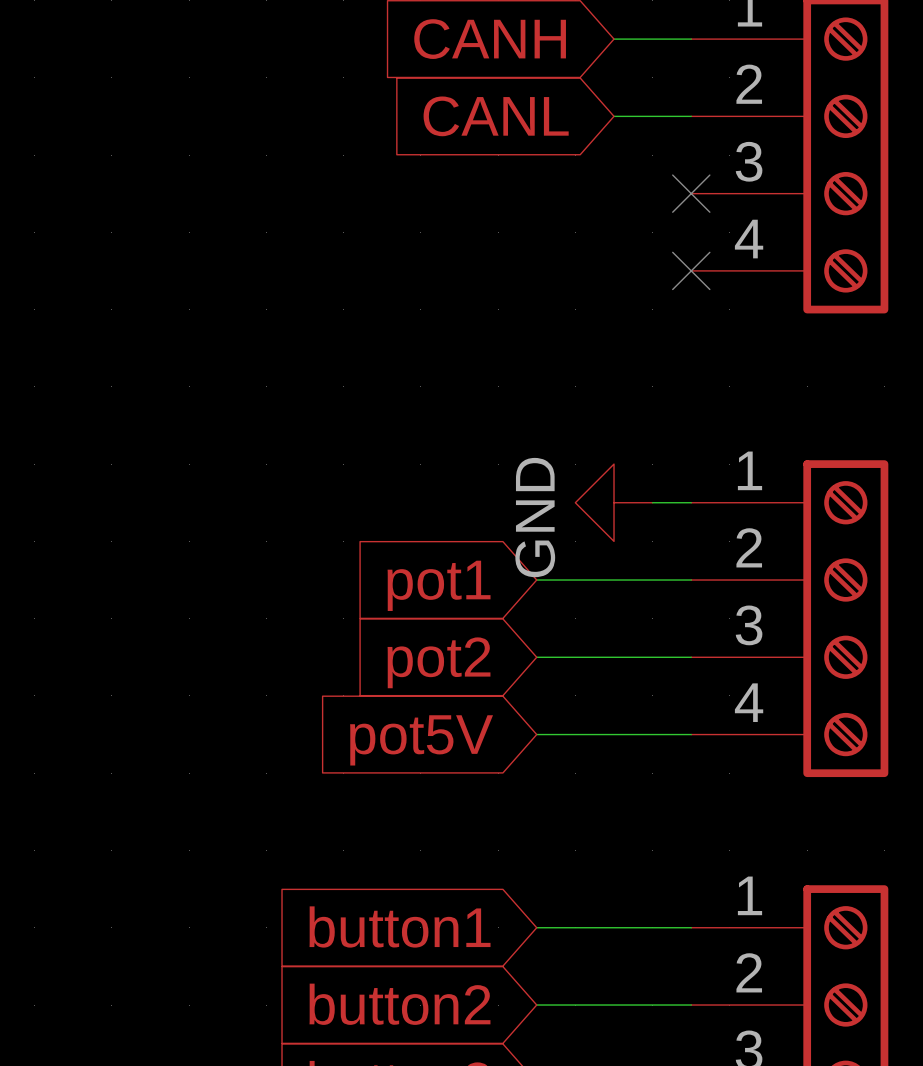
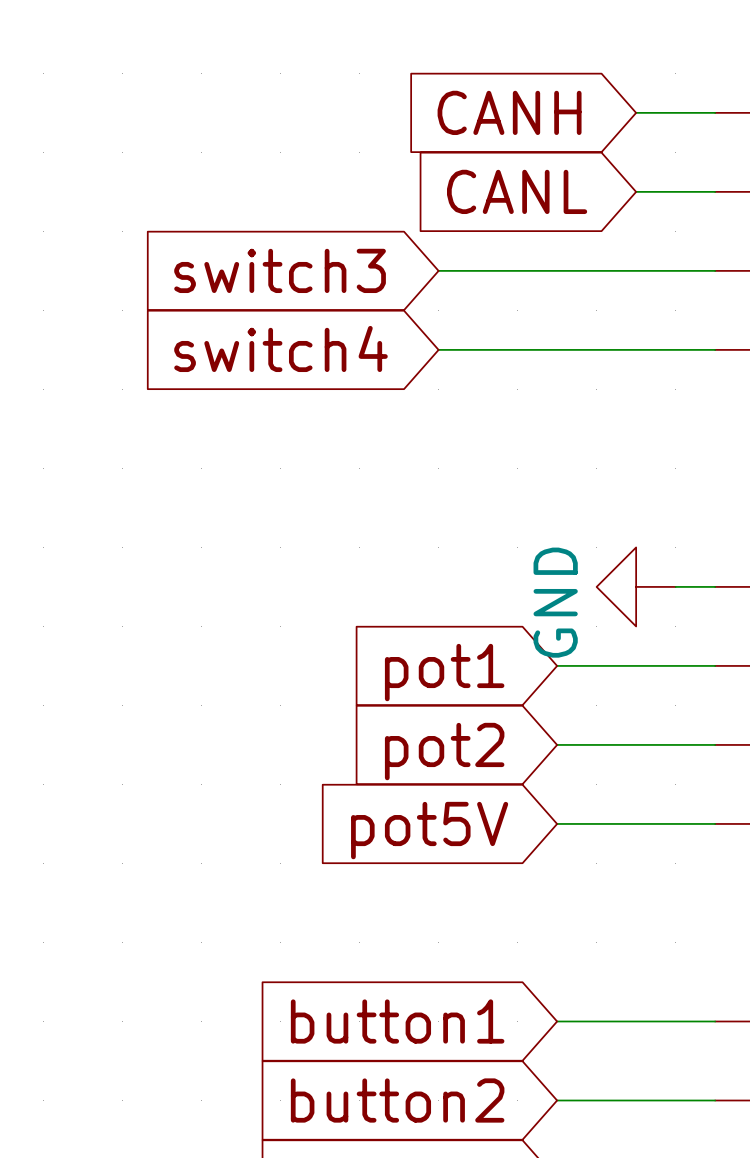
global label: none -> switch3 (280, 270)
wire: none -> (438, 270) (715, 270)
no-connect mark: (691, 193) -> none
global label: none -> switch4 (281, 348)
wire: none -> (438, 349) (715, 349)
no-connect mark: (691, 270) -> none

